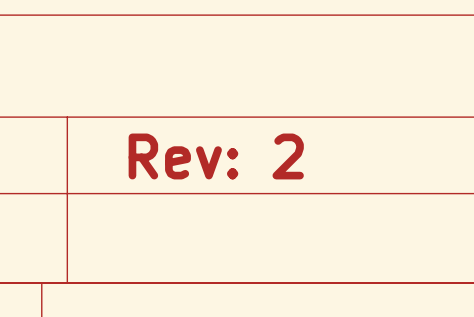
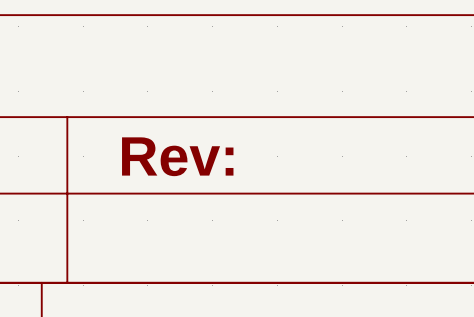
title block: Rev: 2 (216, 156) -> Rev: (177, 156)

